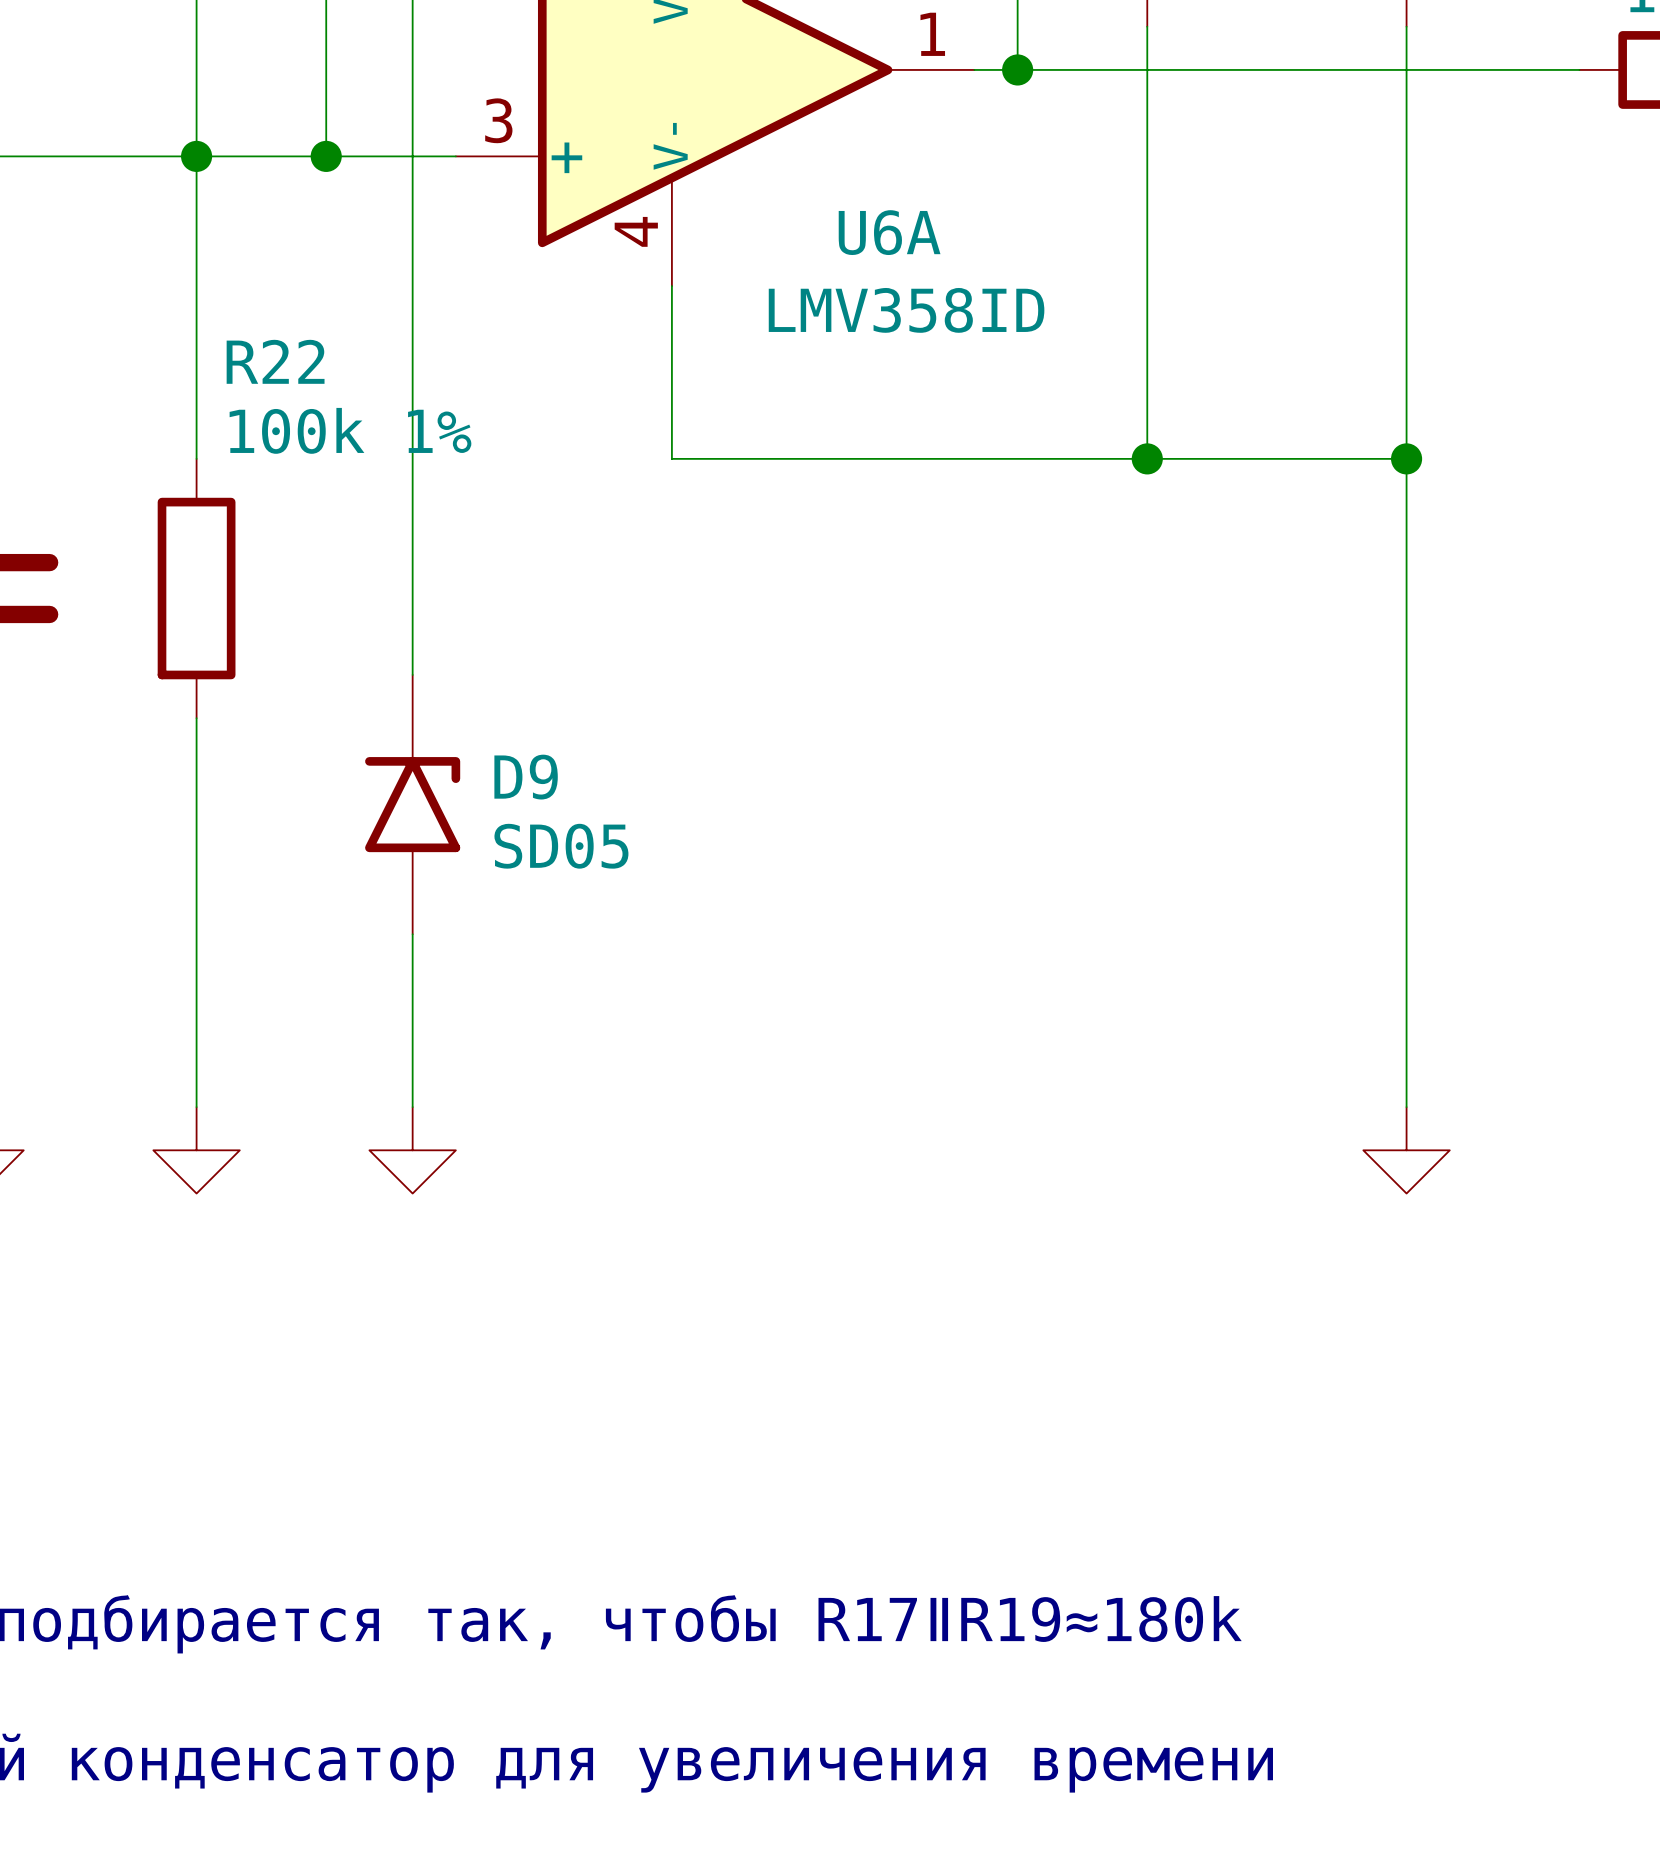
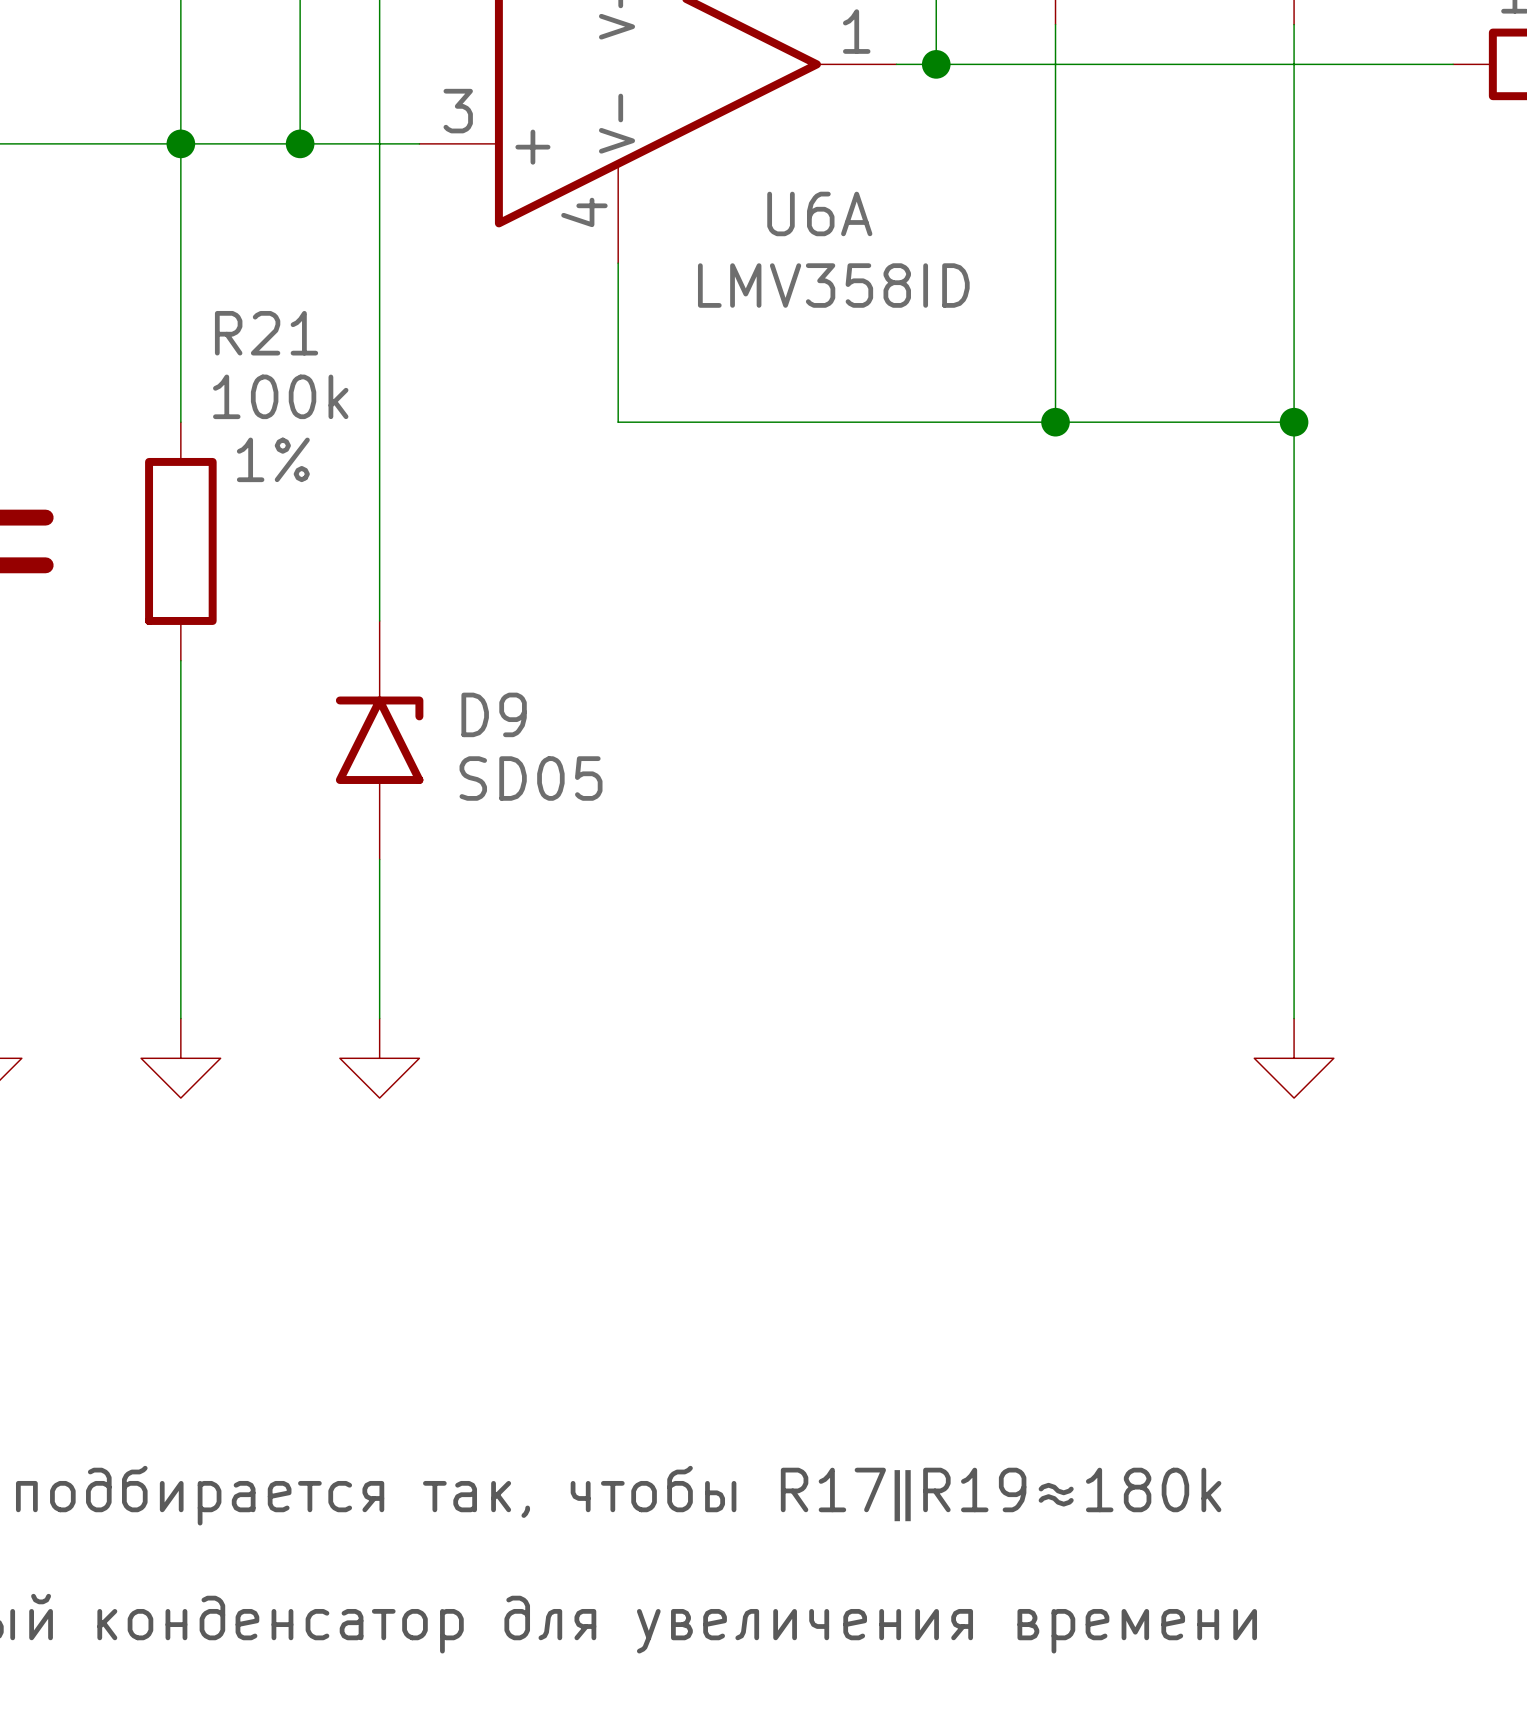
R22 name: R22 (275, 361) -> R21 (266, 333)
R22 value: 100k 1% (350, 430) -> 100k (280, 396)
R22 text: none -> 1% (273, 459)

